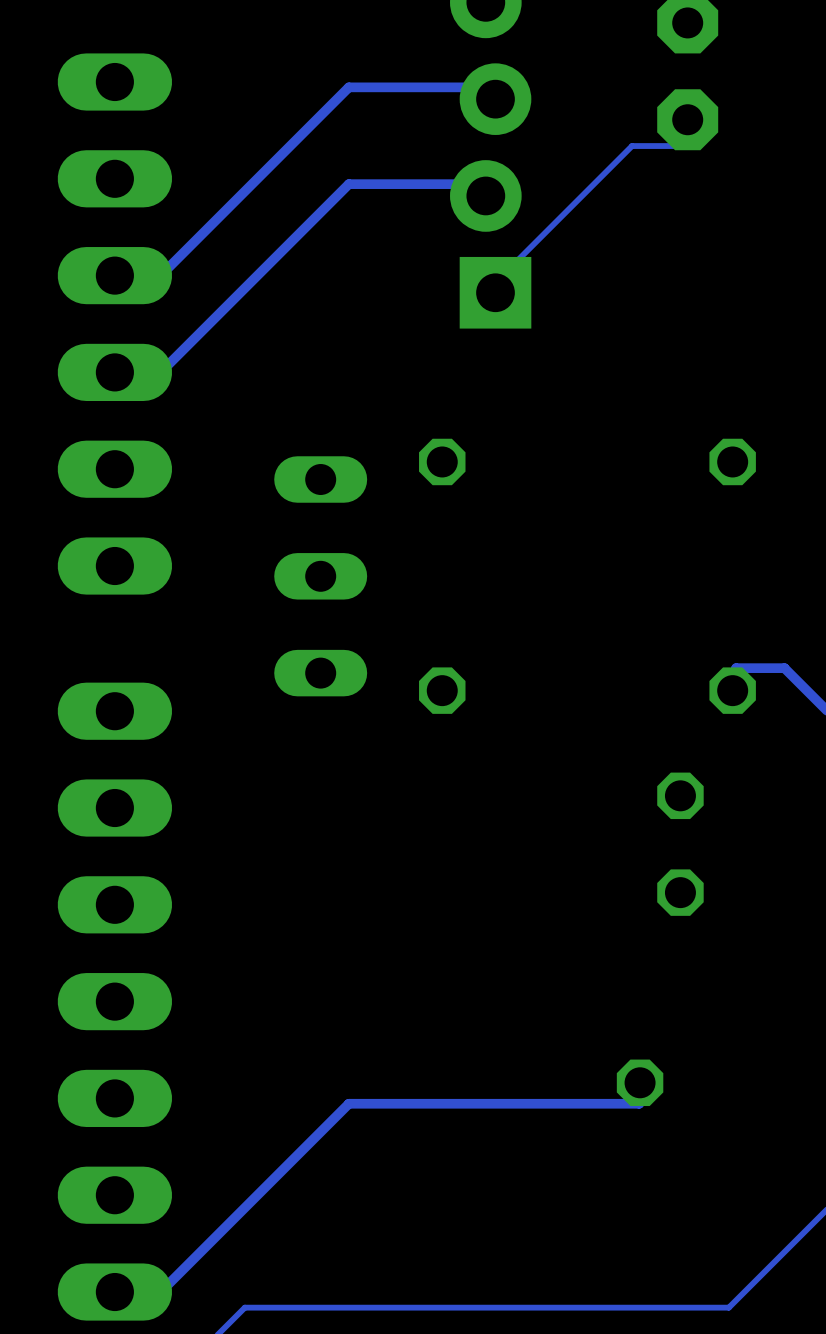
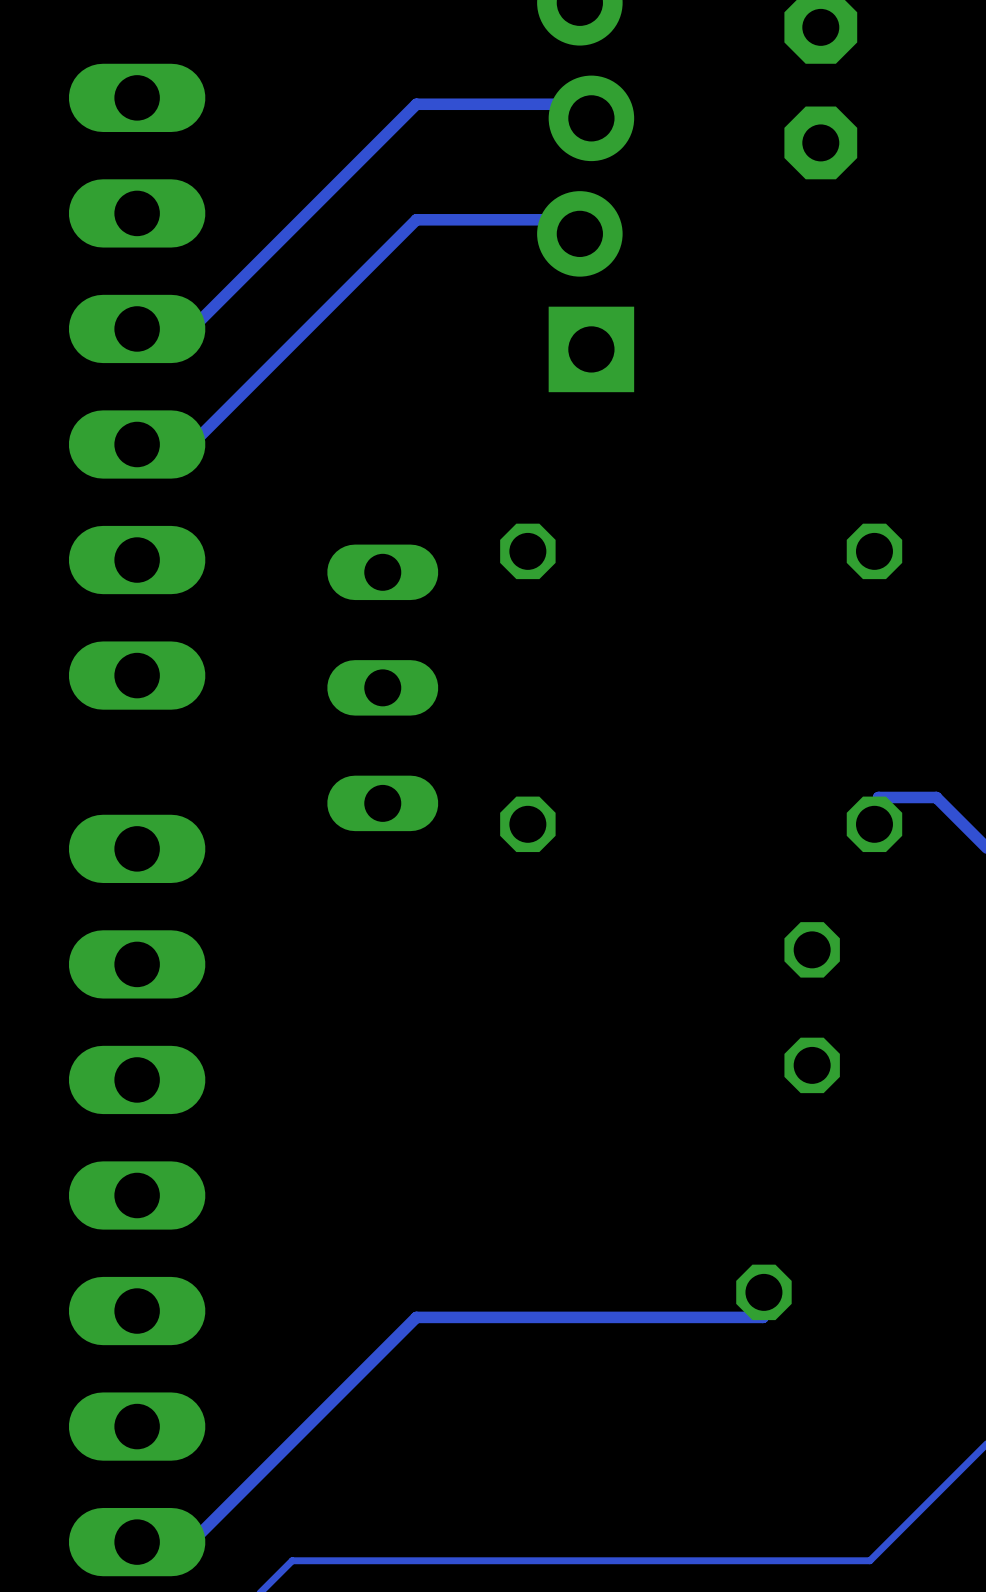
track: (687, 119) (680, 146) (632, 146) (486, 291) -> none

